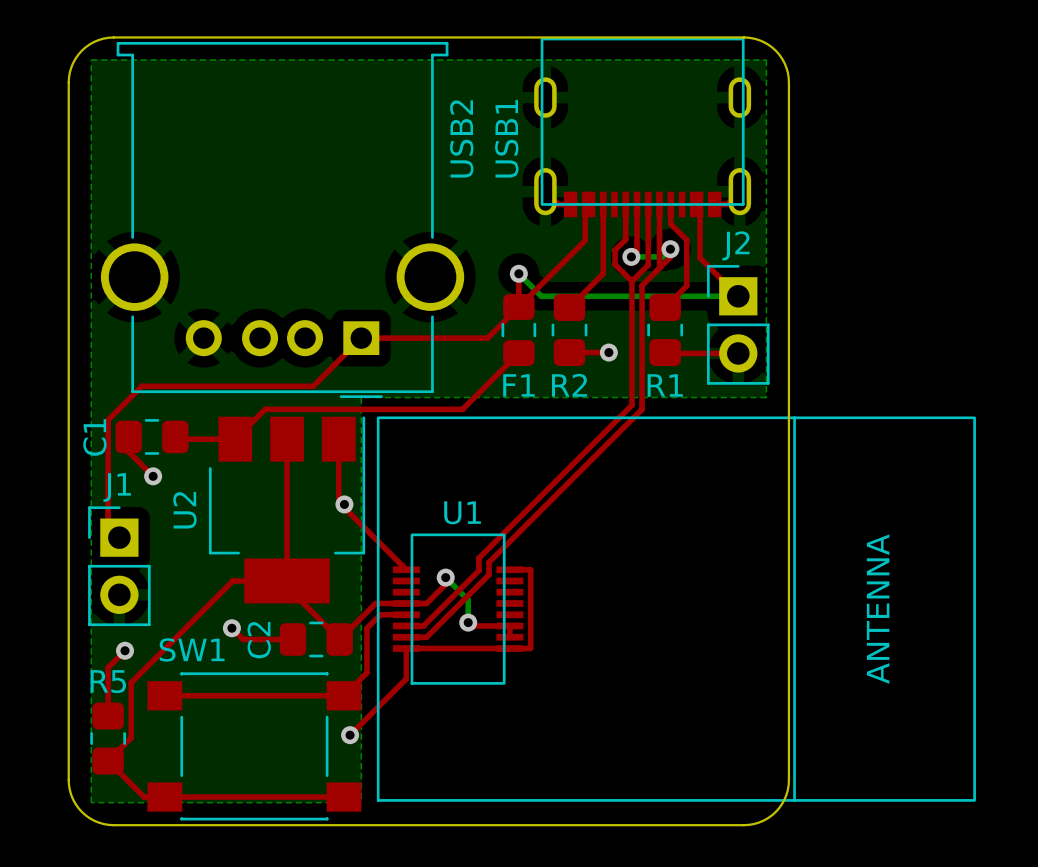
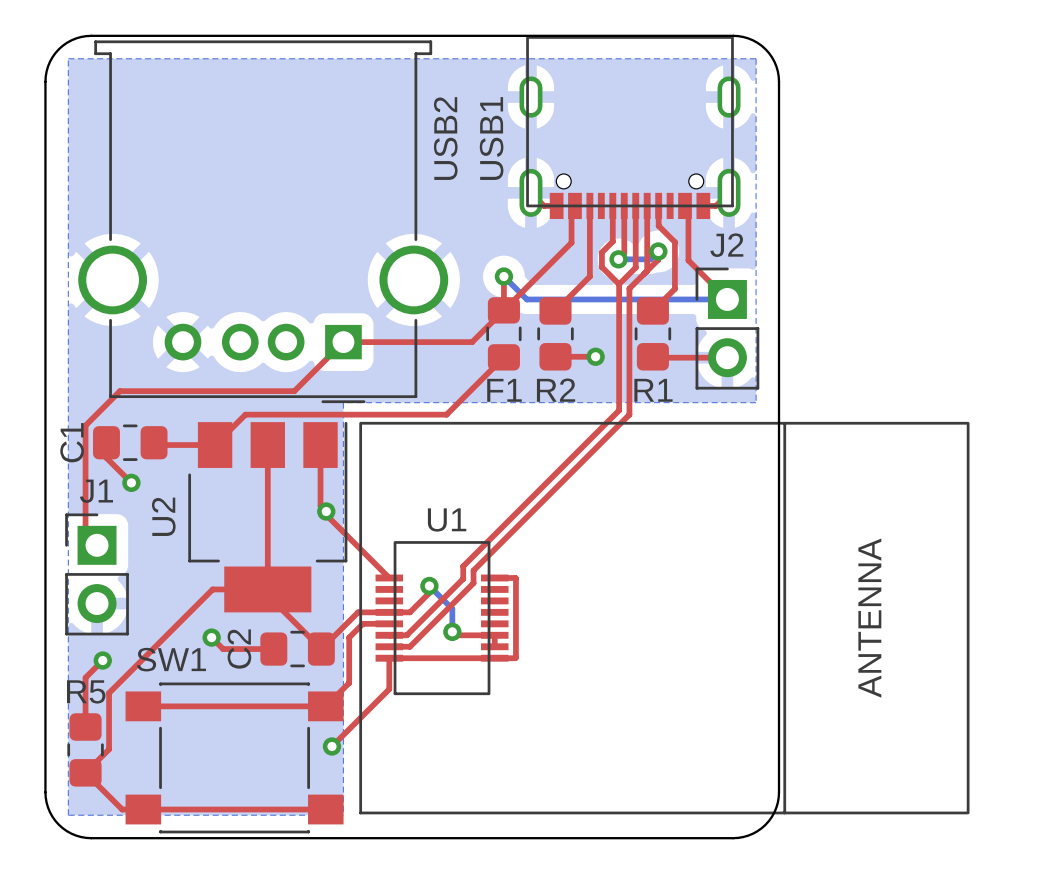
USB1 footprint: [534, 37, 752, 218] -> [519, 36, 741, 220]

